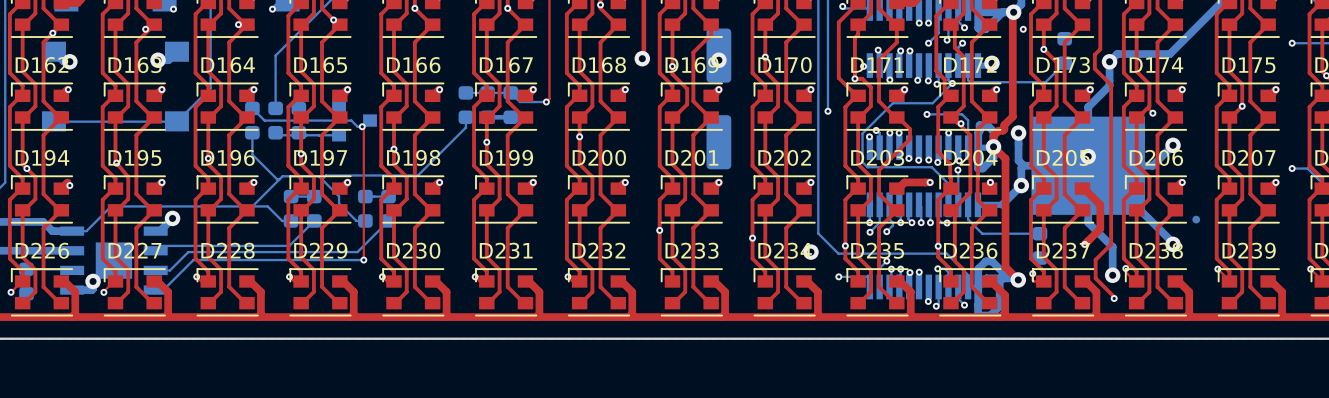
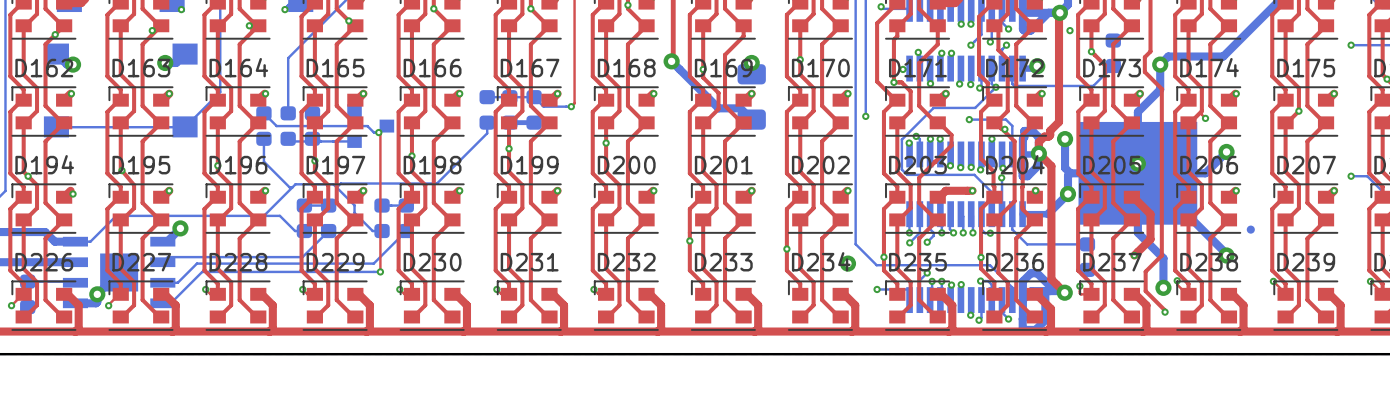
part footprint: [706, 28, 732, 170] -> [737, 64, 766, 130]
bottom track: none -> (671, 61) (718, 108) (740, 108) (751, 119)

